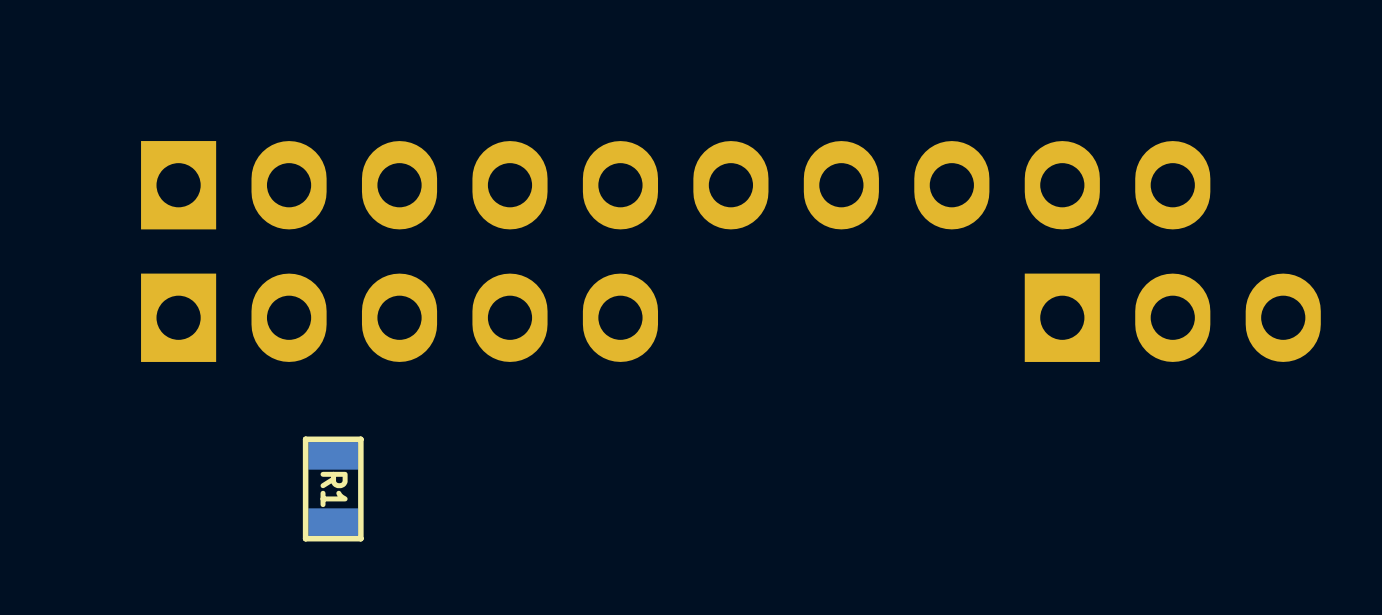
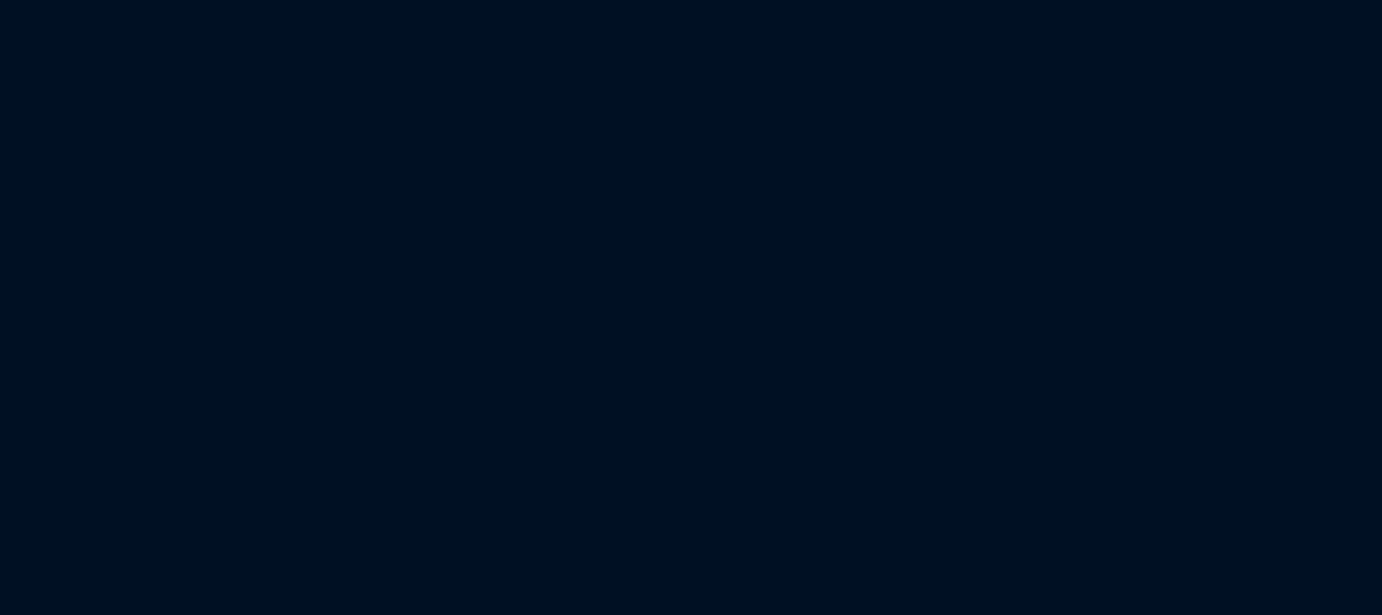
part: (675, 185) -> none
part: (399, 317) -> none
part: (1172, 317) -> none
R1: (333, 489) -> none

